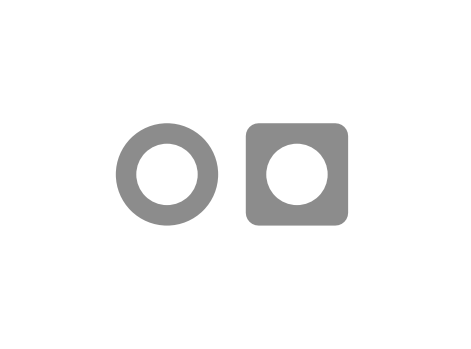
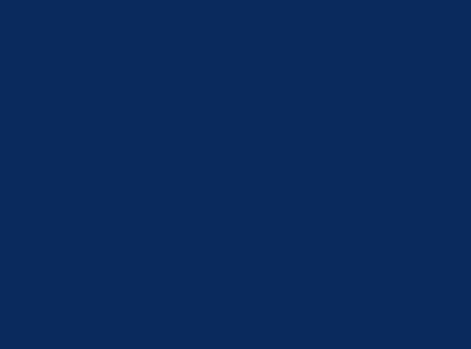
part: (231, 174) -> none

